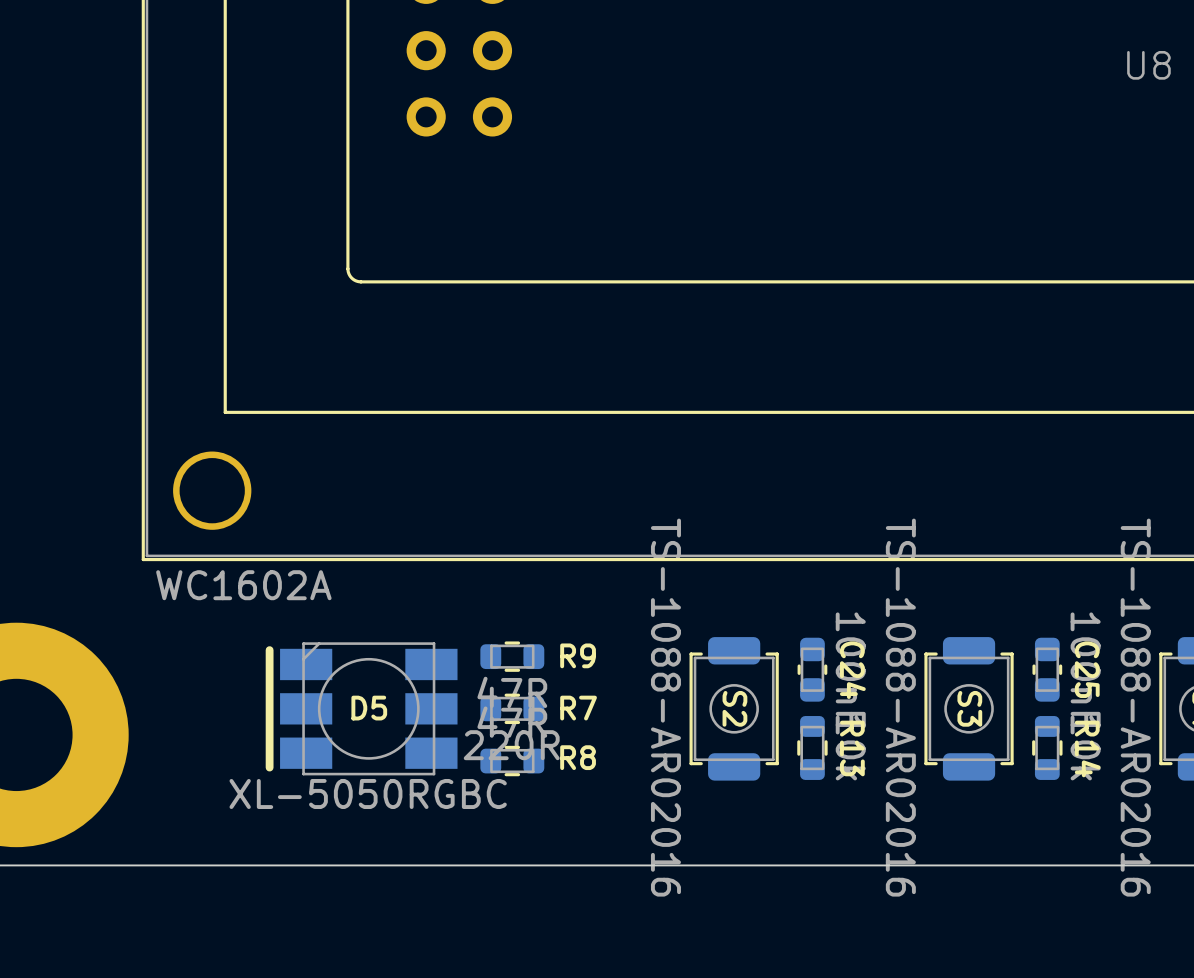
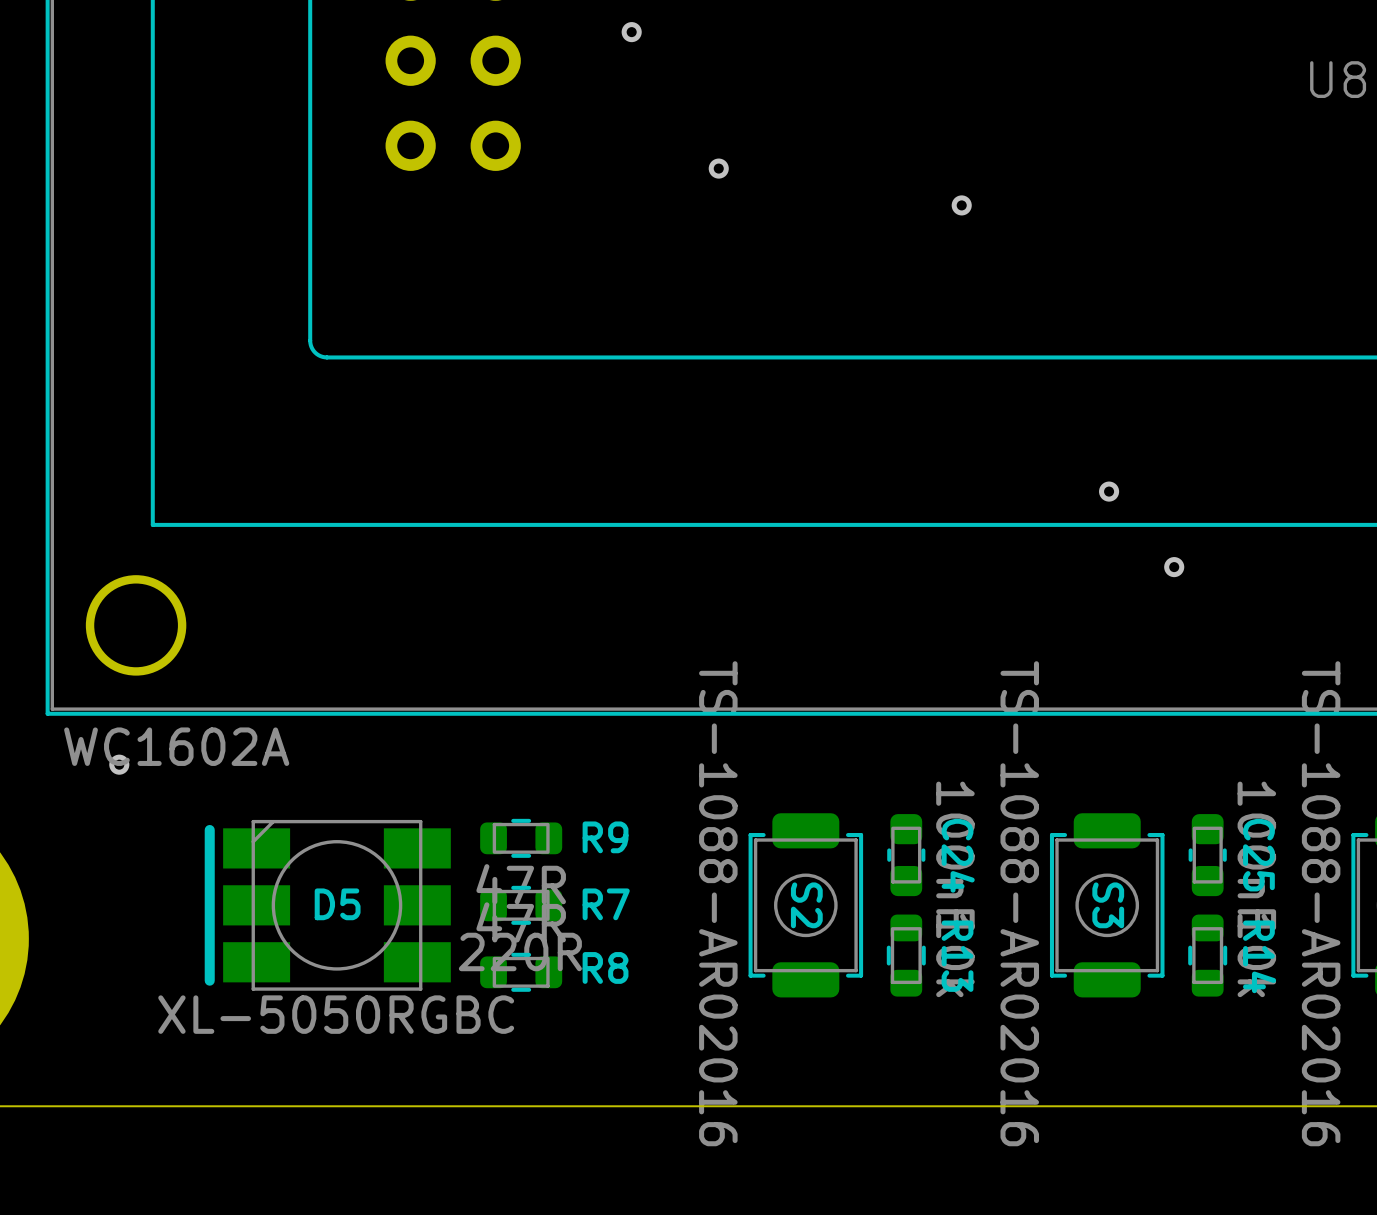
via: none -> (631, 32)
via: none -> (718, 168)
via: none -> (961, 205)
via: none -> (1109, 491)
via: none -> (1174, 567)
via: none -> (119, 764)

